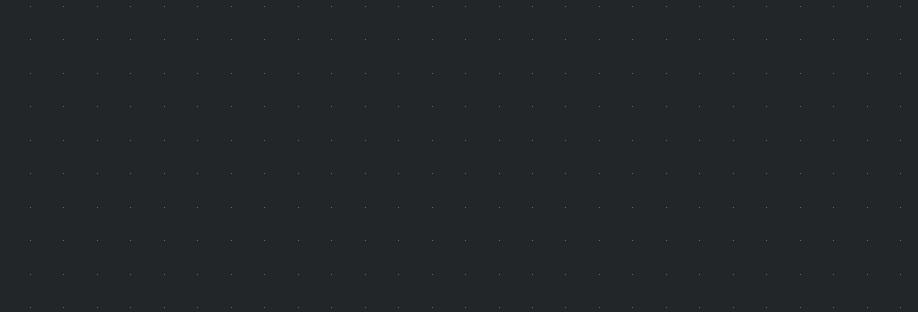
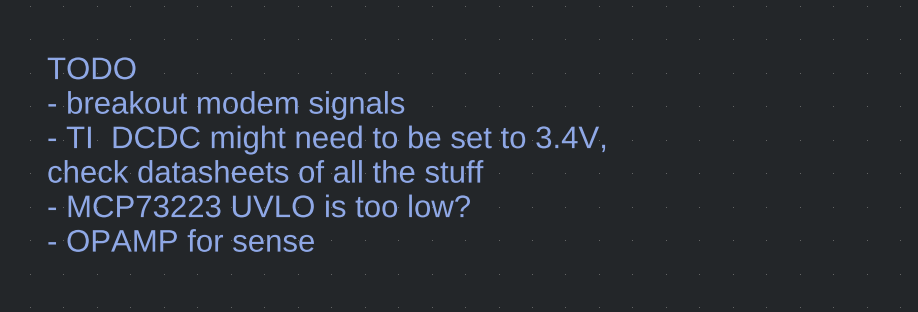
text: none -> TODO (91, 68)
text: none -> - breakout modem signals (226, 105)
text: none -> - TI DCDC might need to be set to 3.4V, (326, 140)
text: none -> check datasheets of all the stuff (265, 171)
text: none -> - MCP73223 UVLO is too low? (259, 205)
text: none -> - OPAMP for sense (181, 240)

